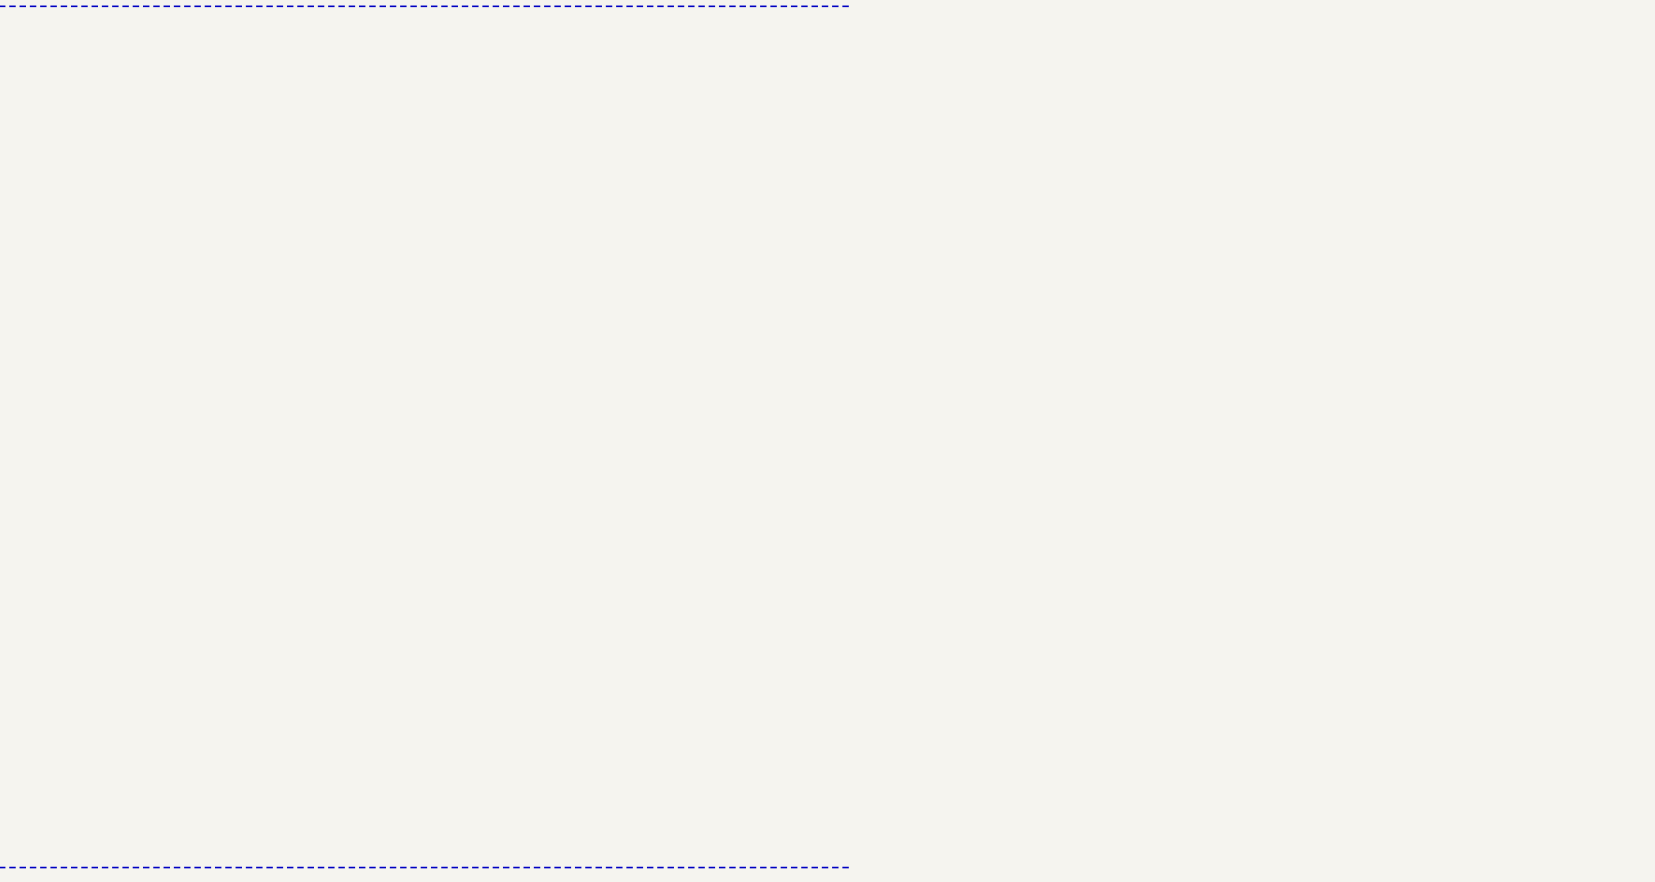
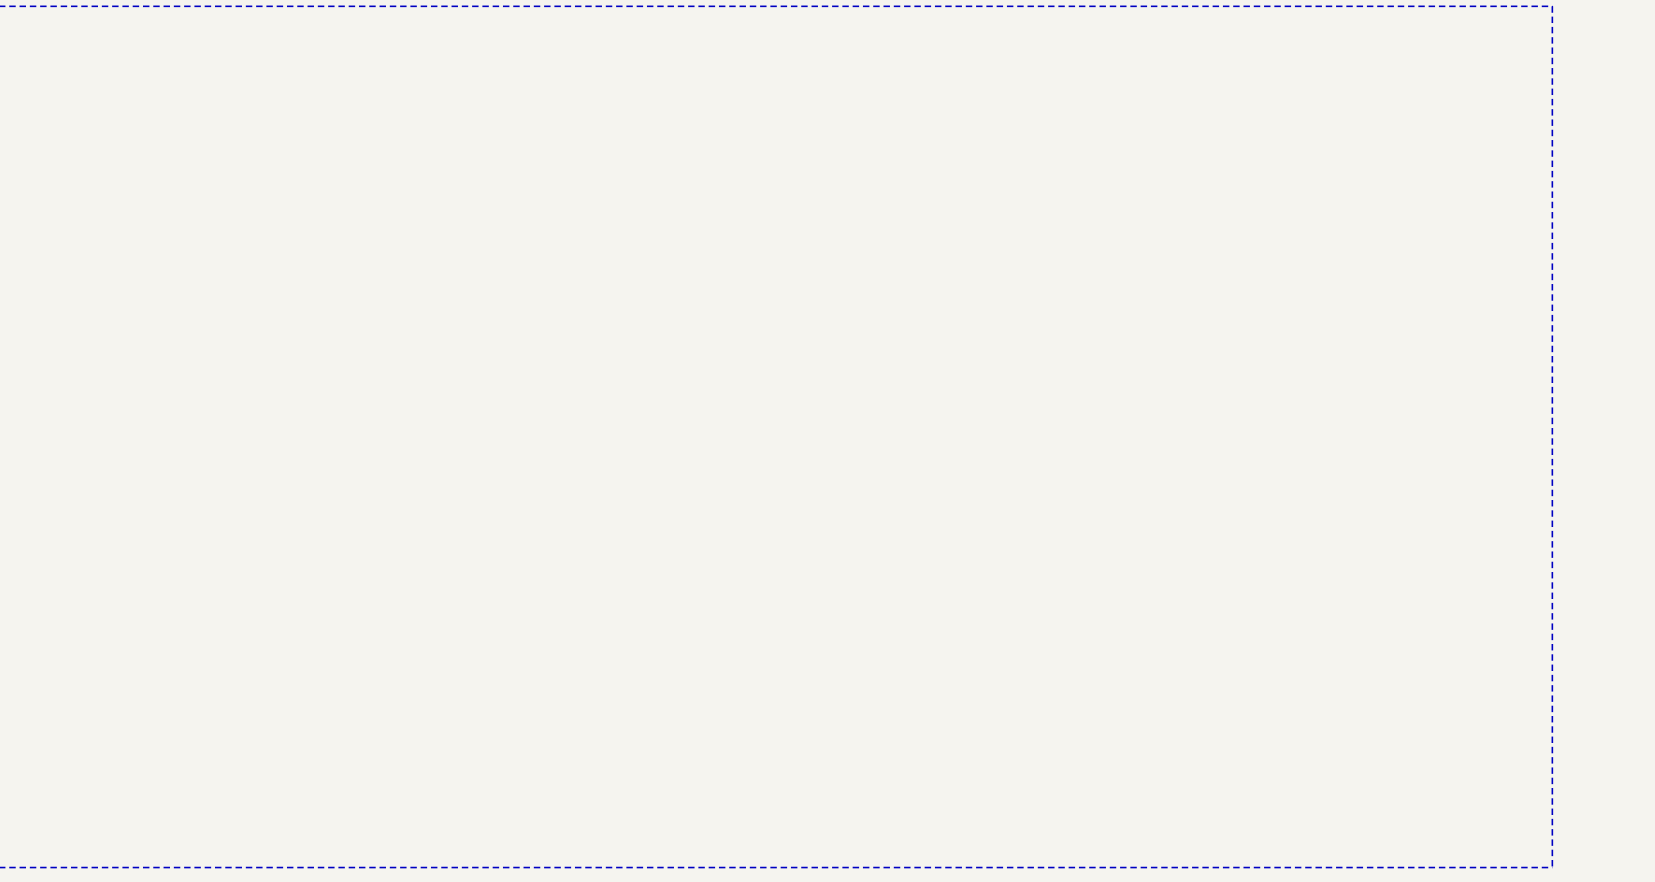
line: none -> (852, 6) (1552, 6) (1552, 867) (852, 867)

